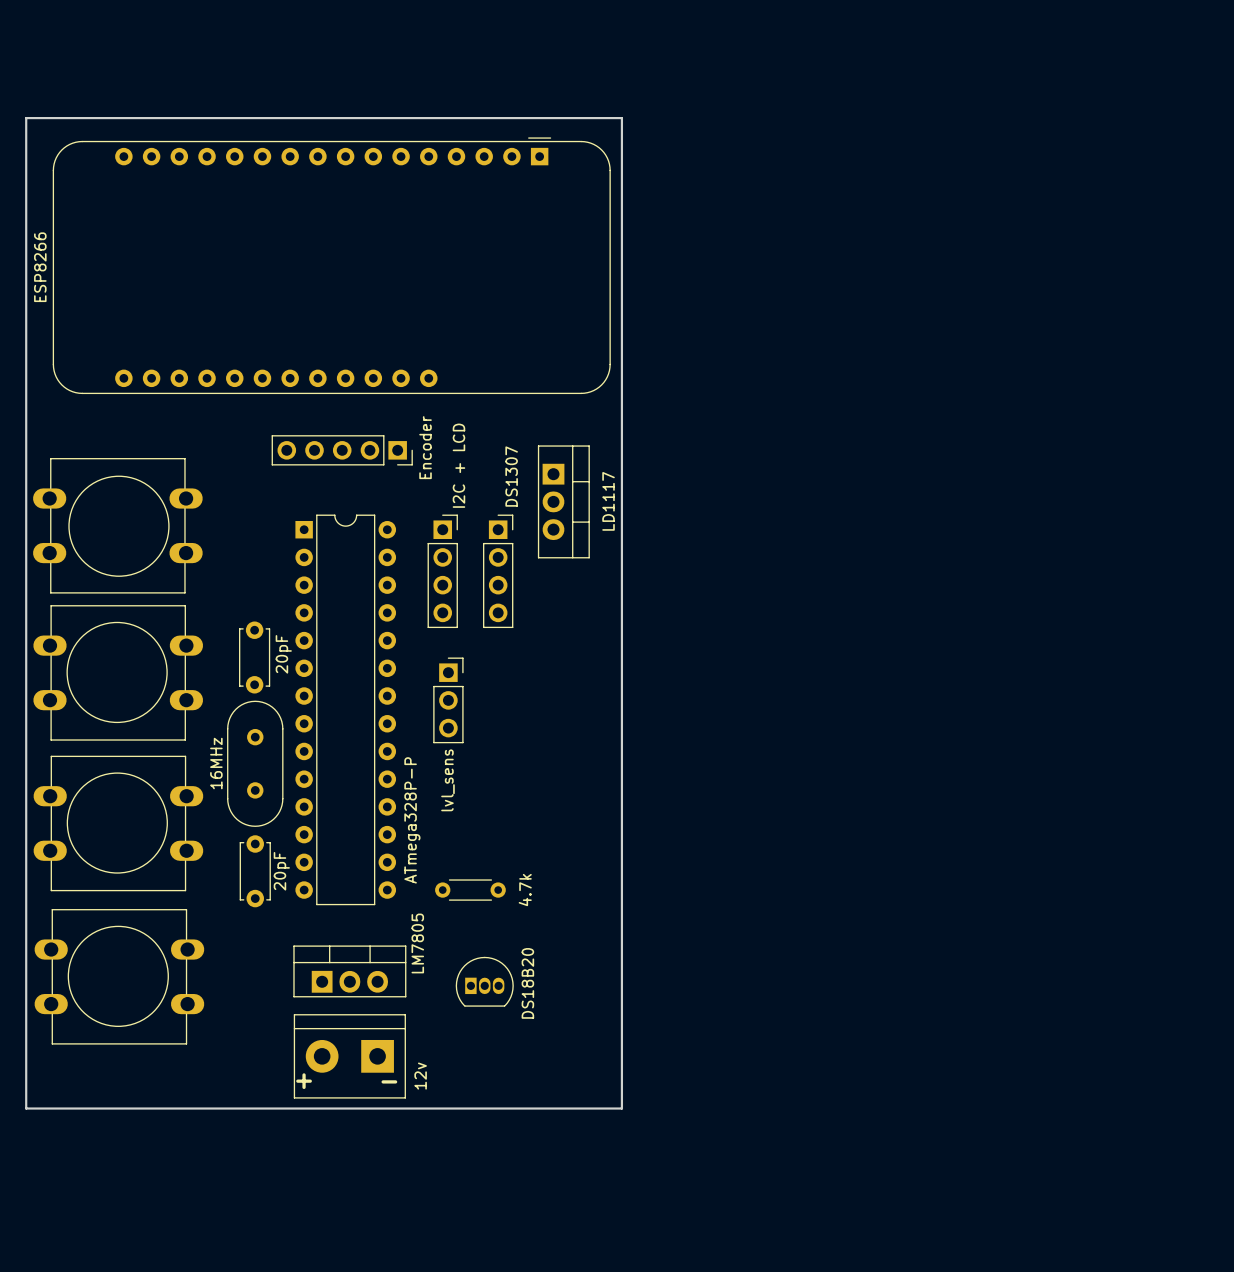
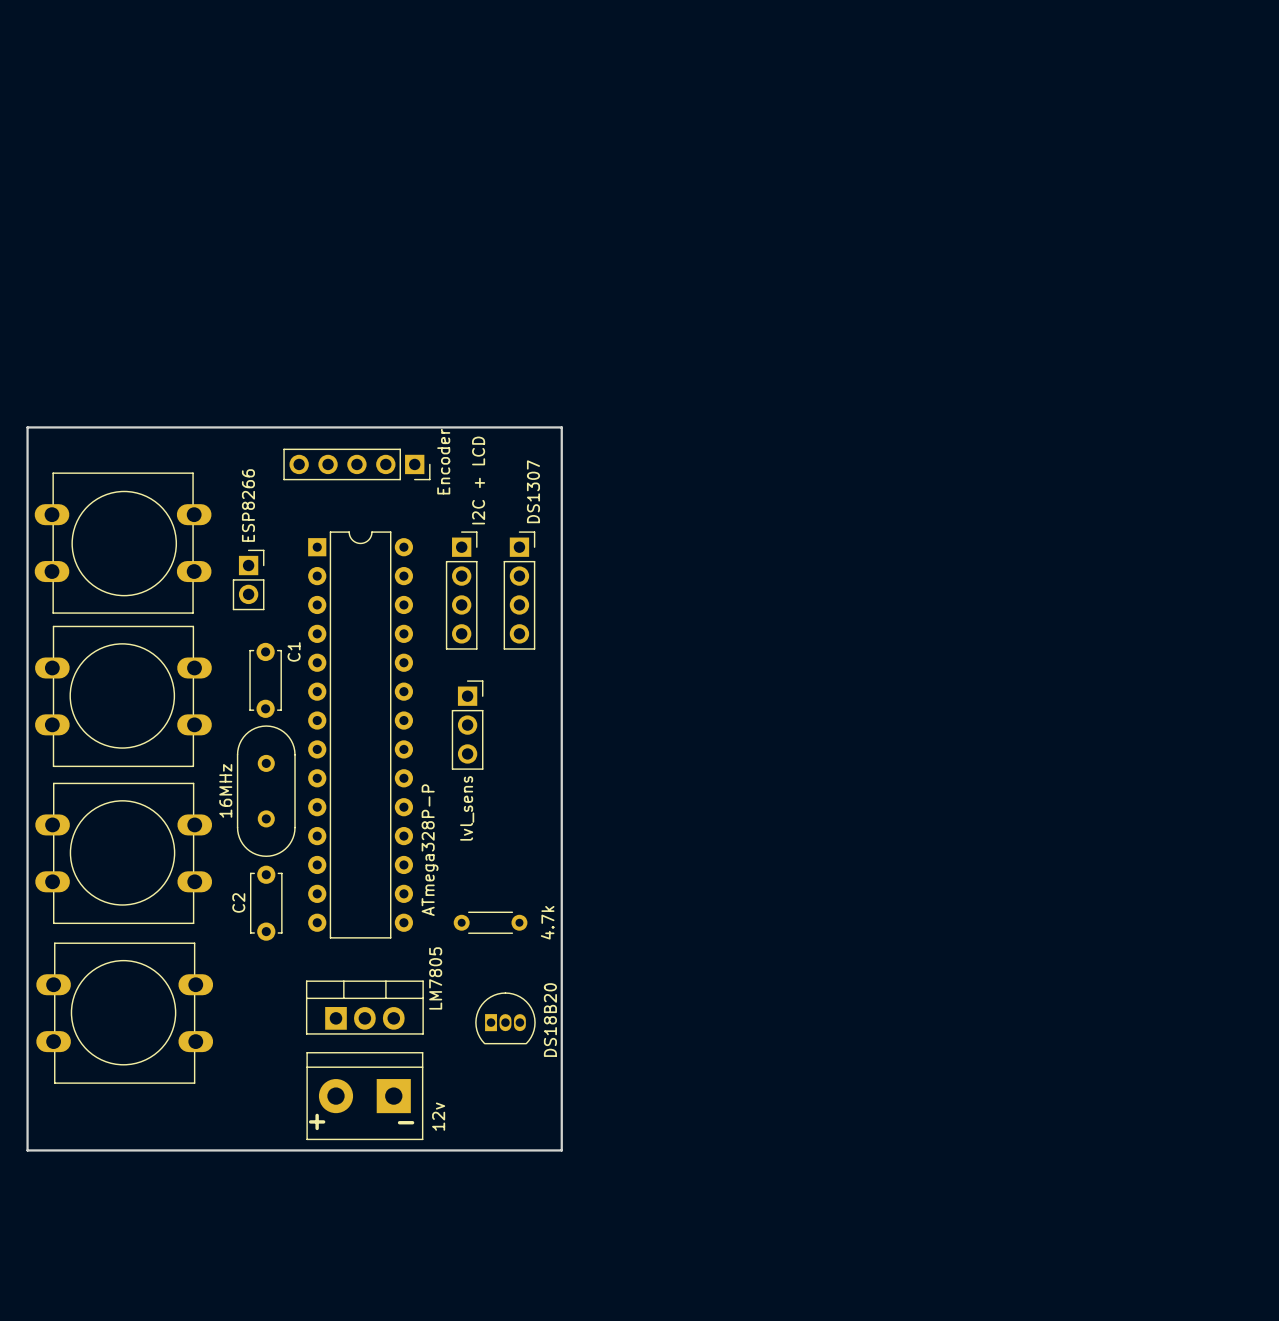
part: ESP8266 (331, 265) -> none
board edge: (26, 414) (26, 118) (621, 118) (621, 1108) (538, 1108) -> (27, 427) (561, 427) (561, 1150)
part: LD1117 (563, 501) -> none
part: none -> ESP8266 (248, 579)
20pF name: 20pF (283, 654) -> C1 (294, 651)
20pF name: 20pF (281, 871) -> C2 (238, 902)

